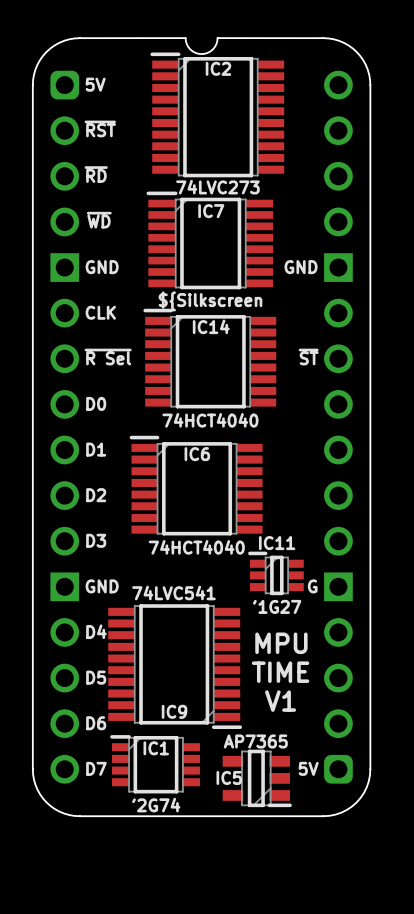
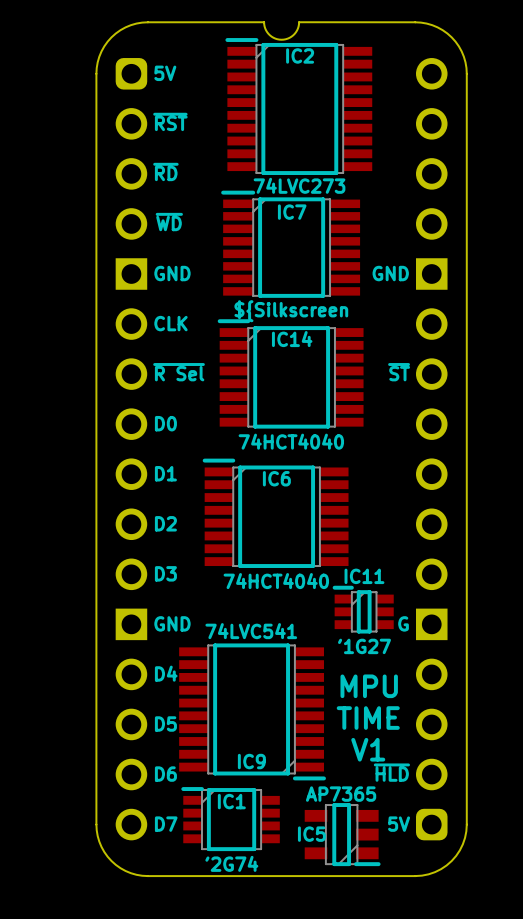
text: none -> ~{HLD} (391, 772)

